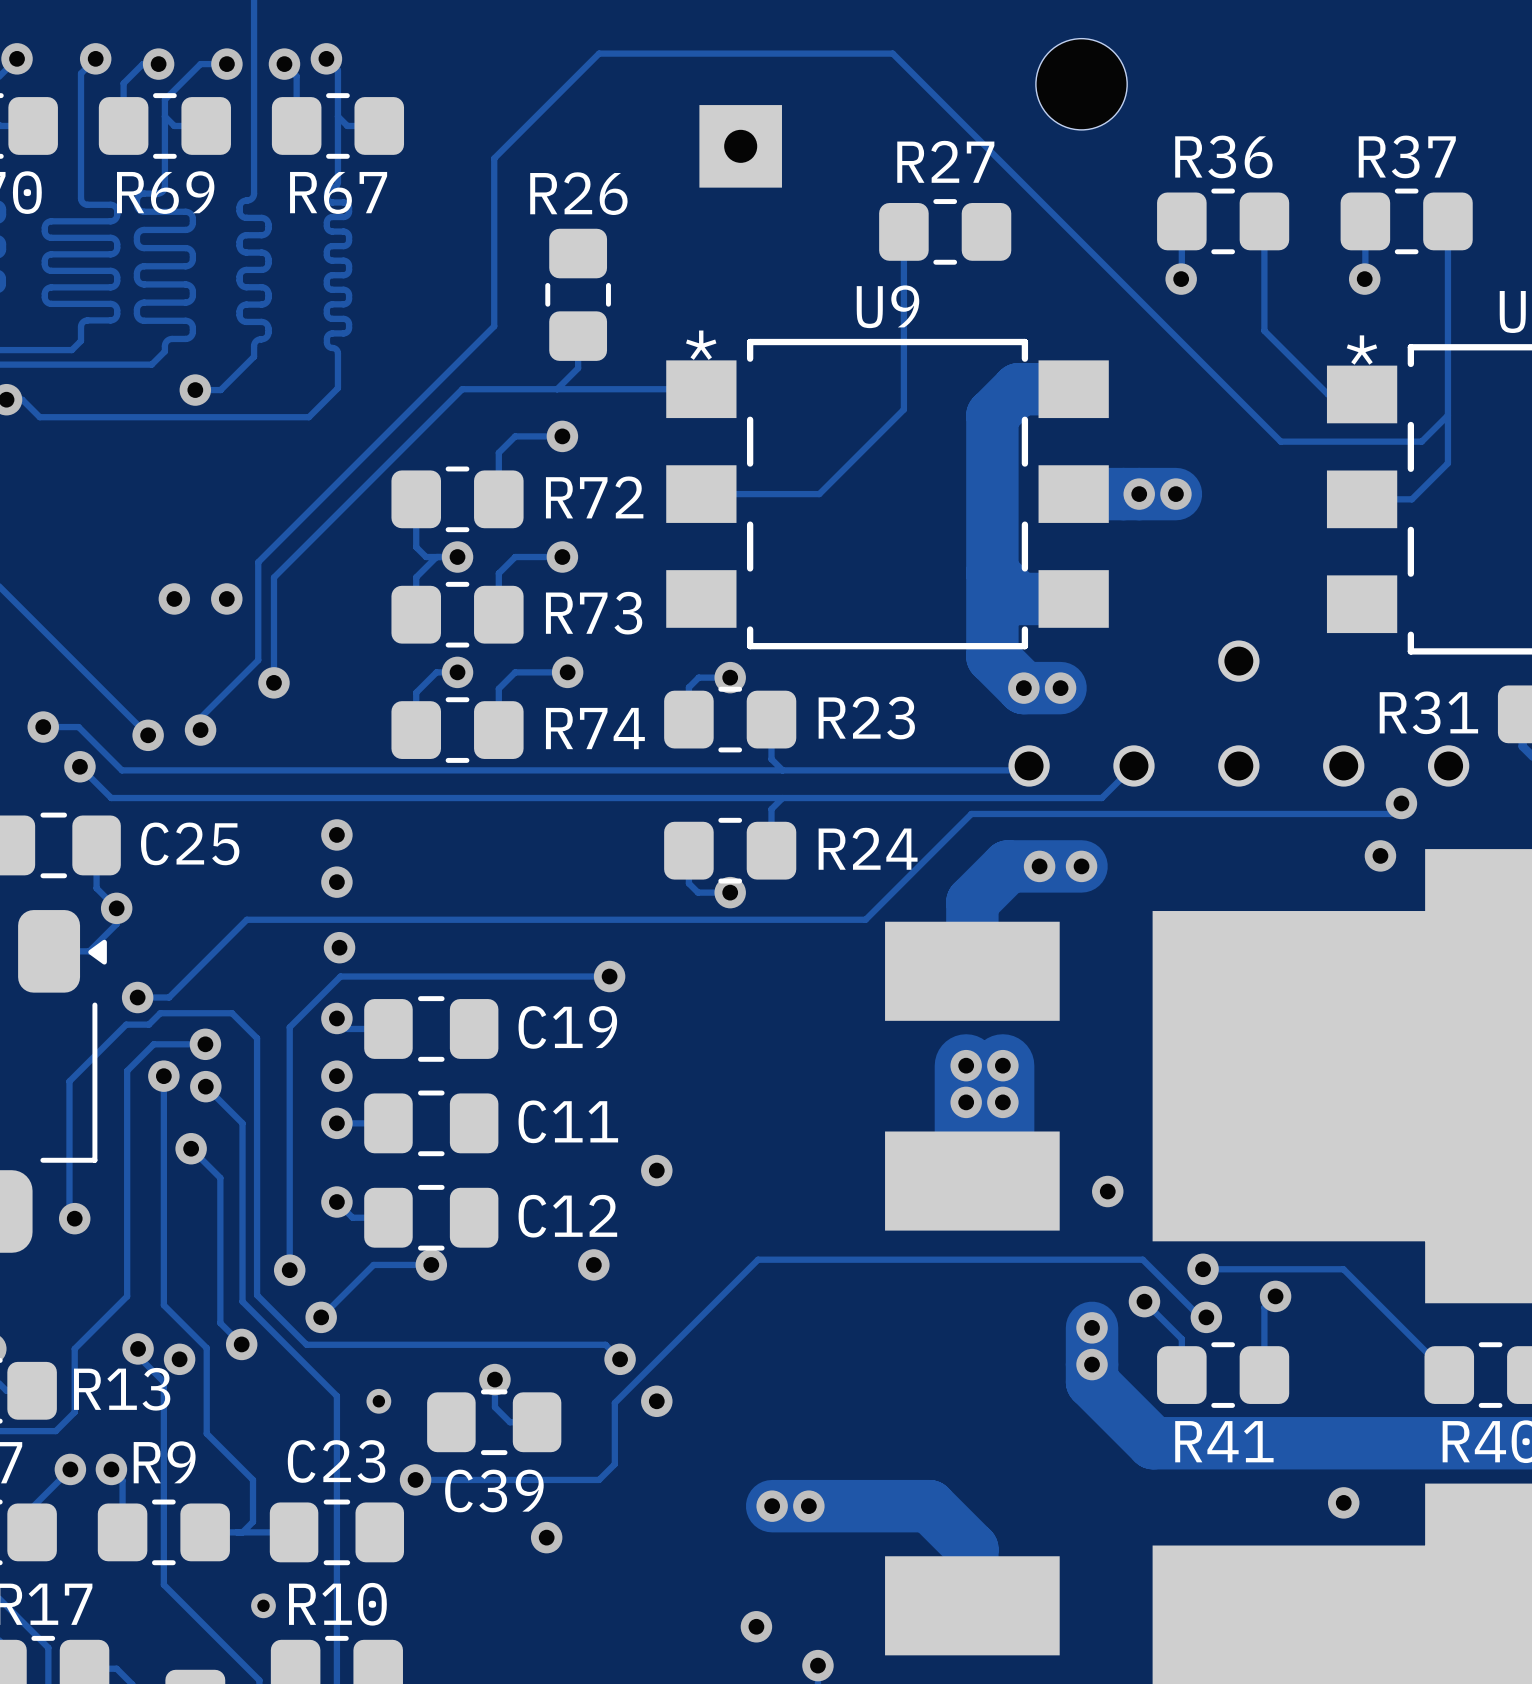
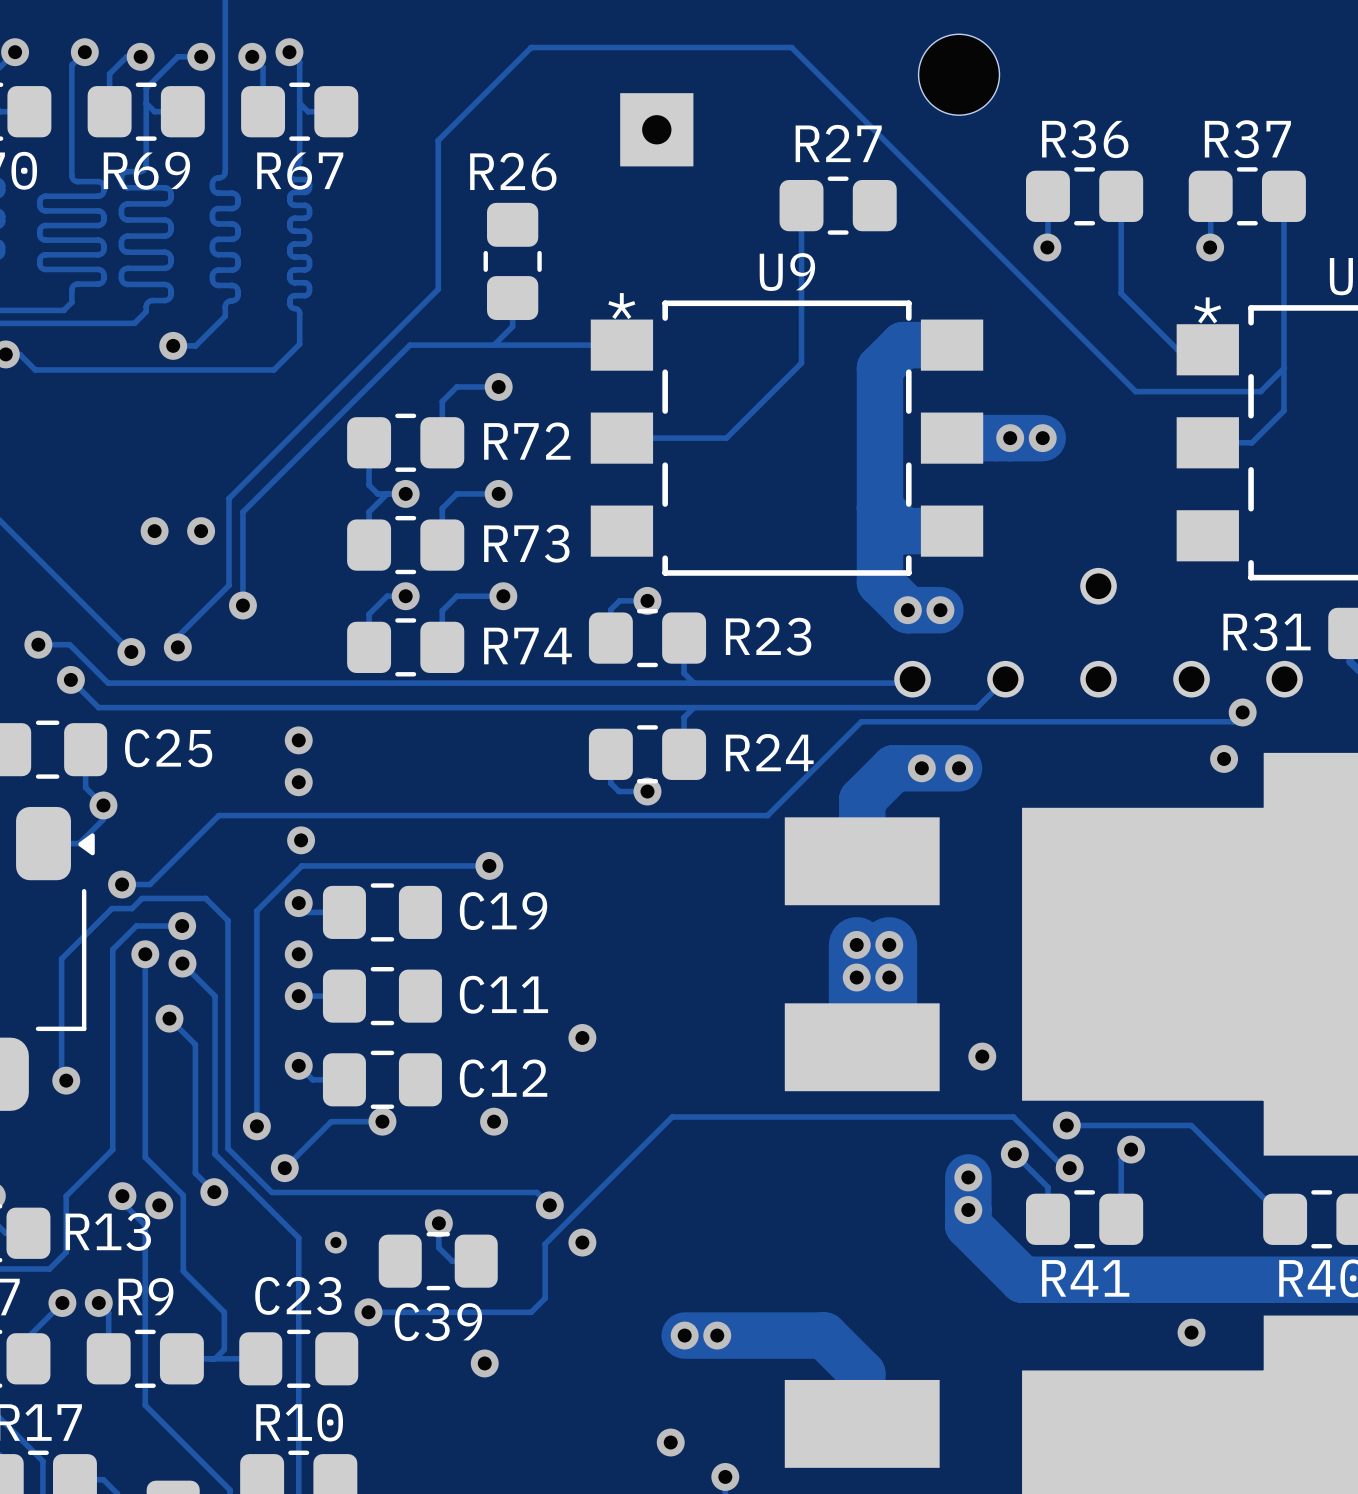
track: (609, 976) (551, 976) -> none
via position: (609, 976) -> (489, 865)
via position: (593, 1264) -> (494, 1121)
via: (263, 1605) -> none

